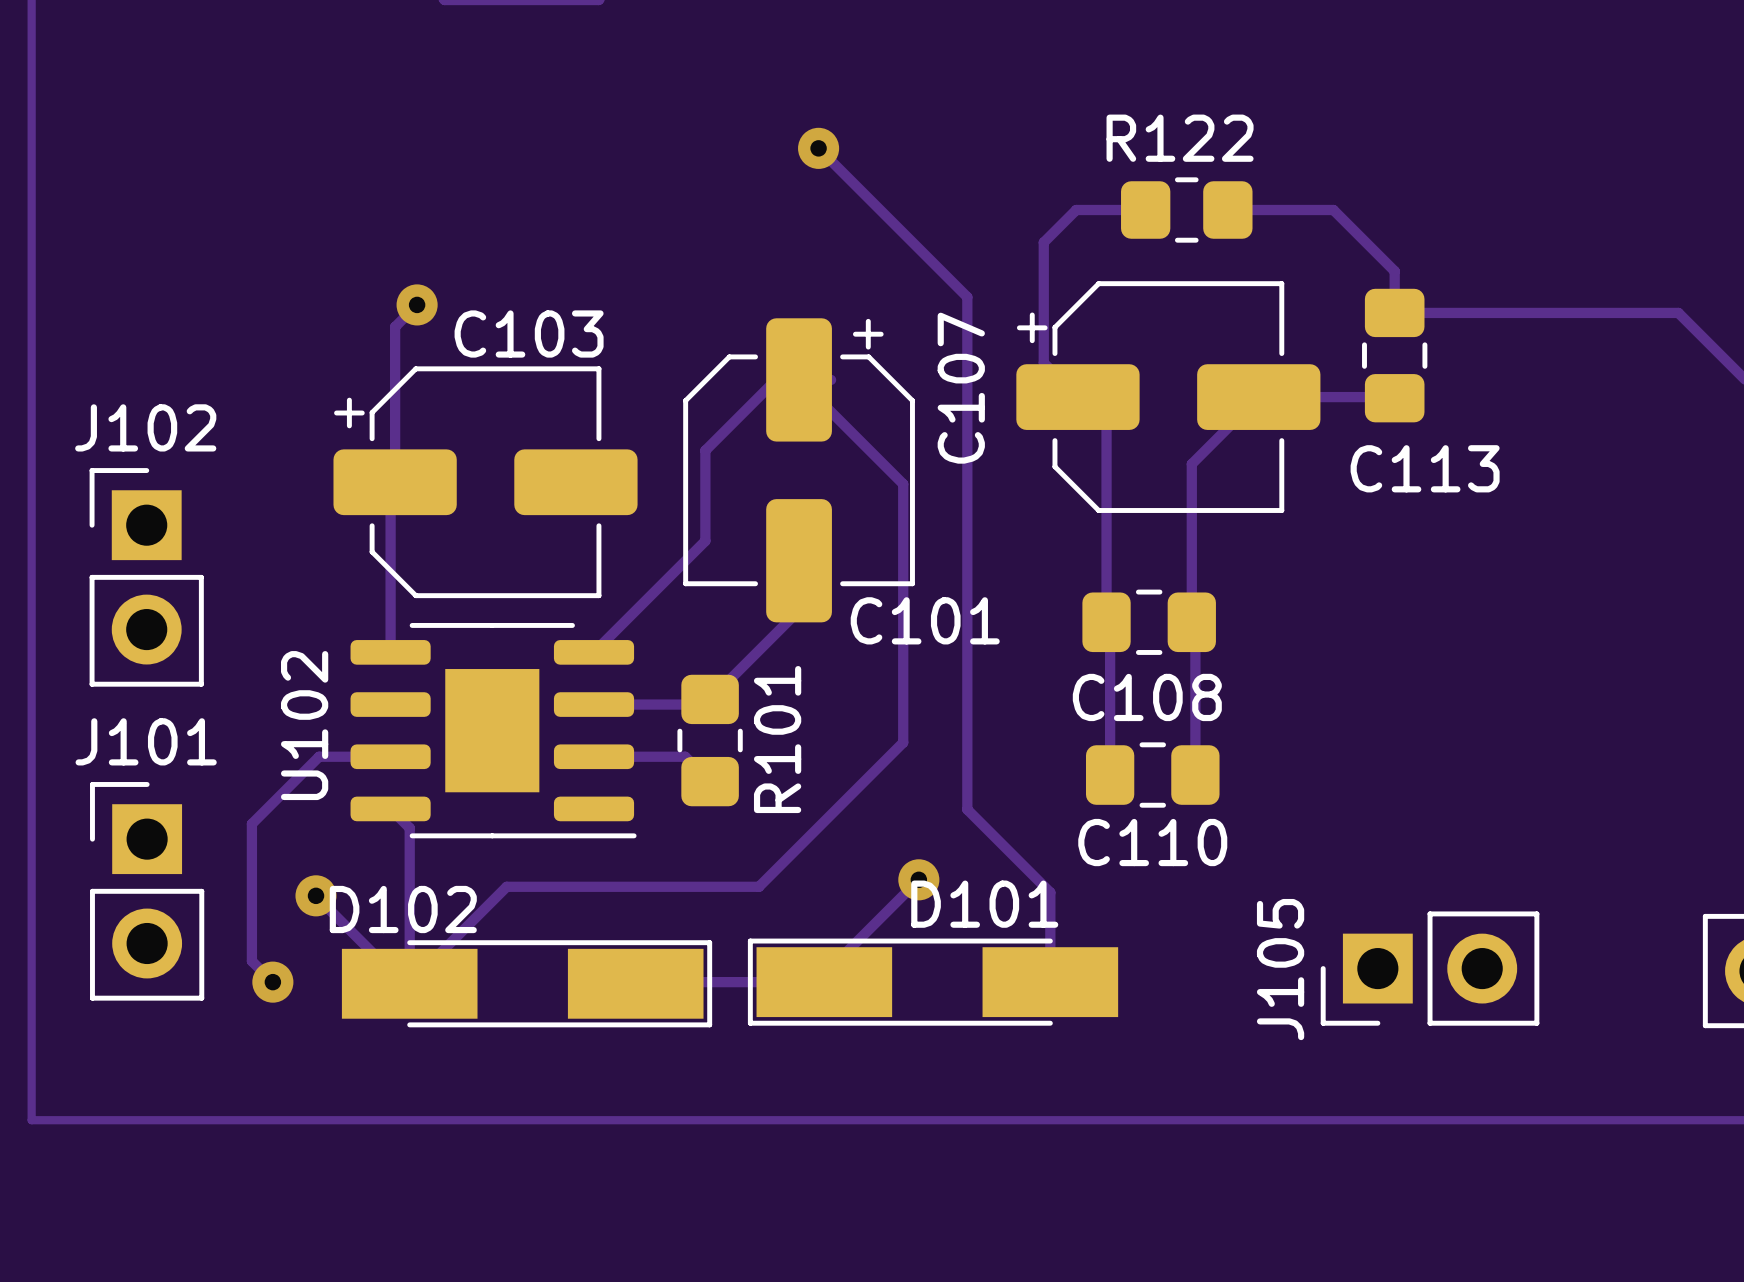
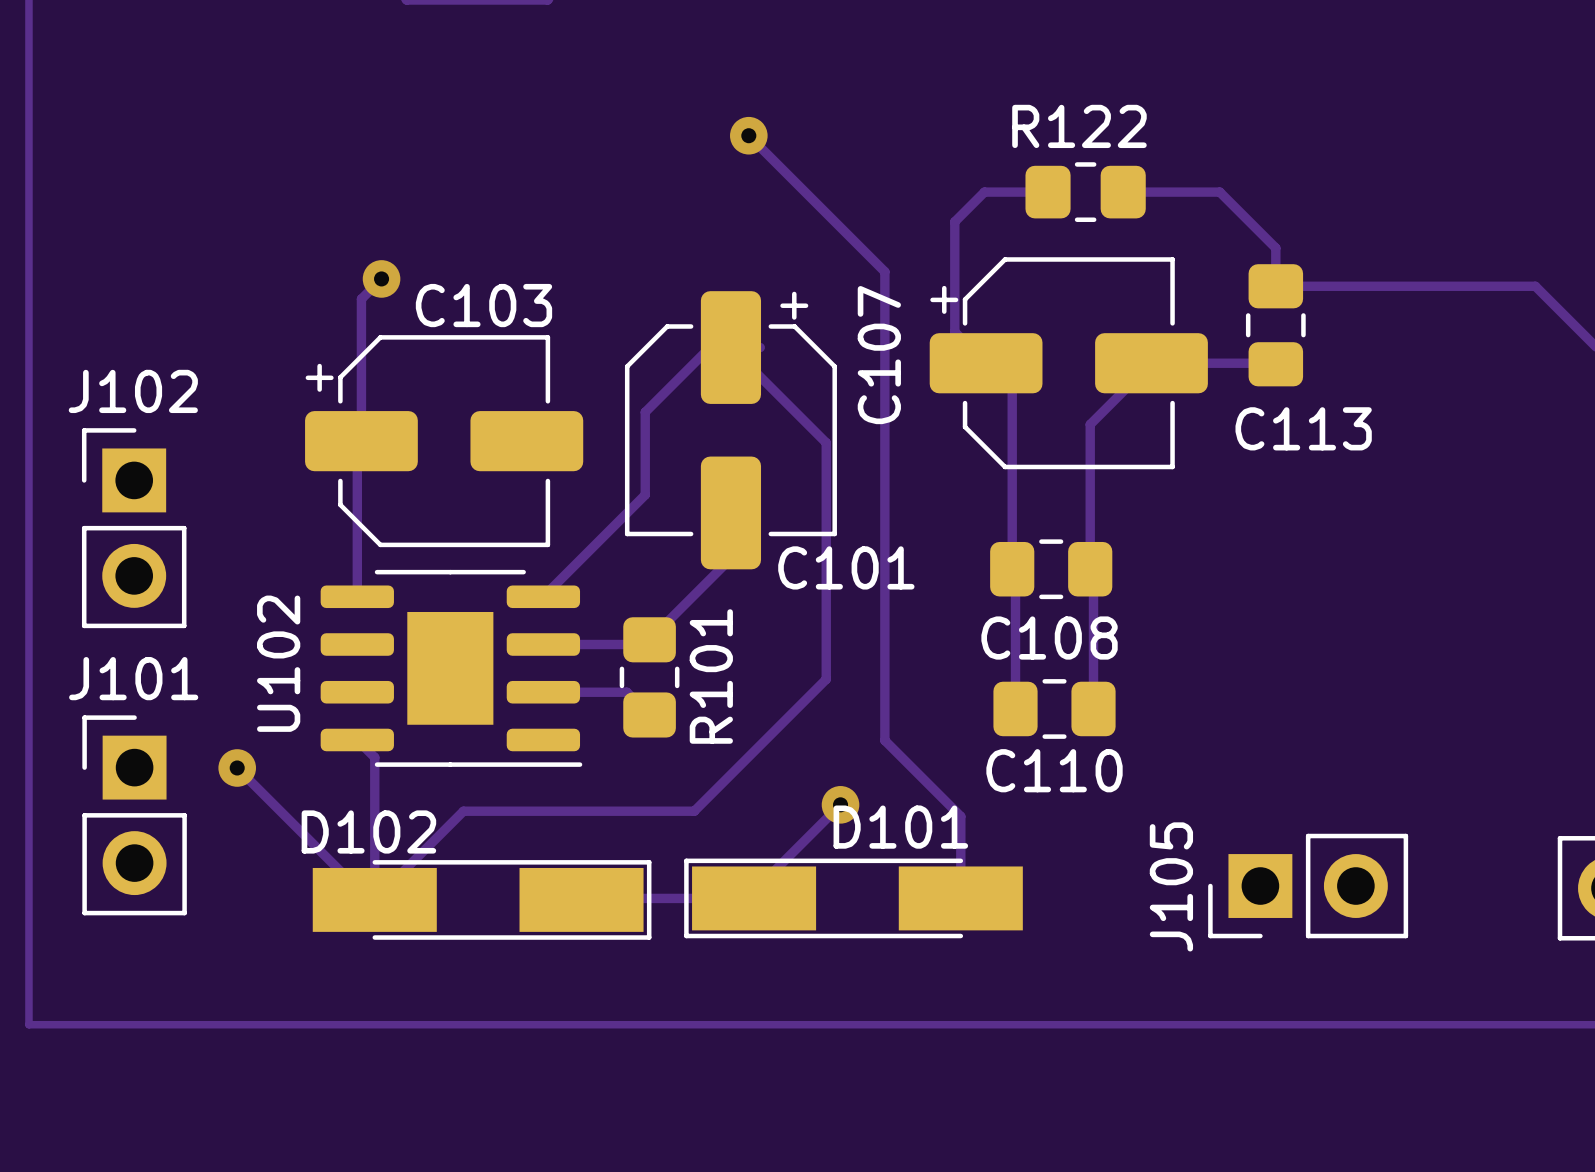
track: (390, 756) (319, 756) (251, 823) (251, 961) (272, 982) -> none
track: none -> (237, 767) (289, 819)
via: none -> (237, 767)
via: (316, 895) -> none
via: (272, 982) -> none

